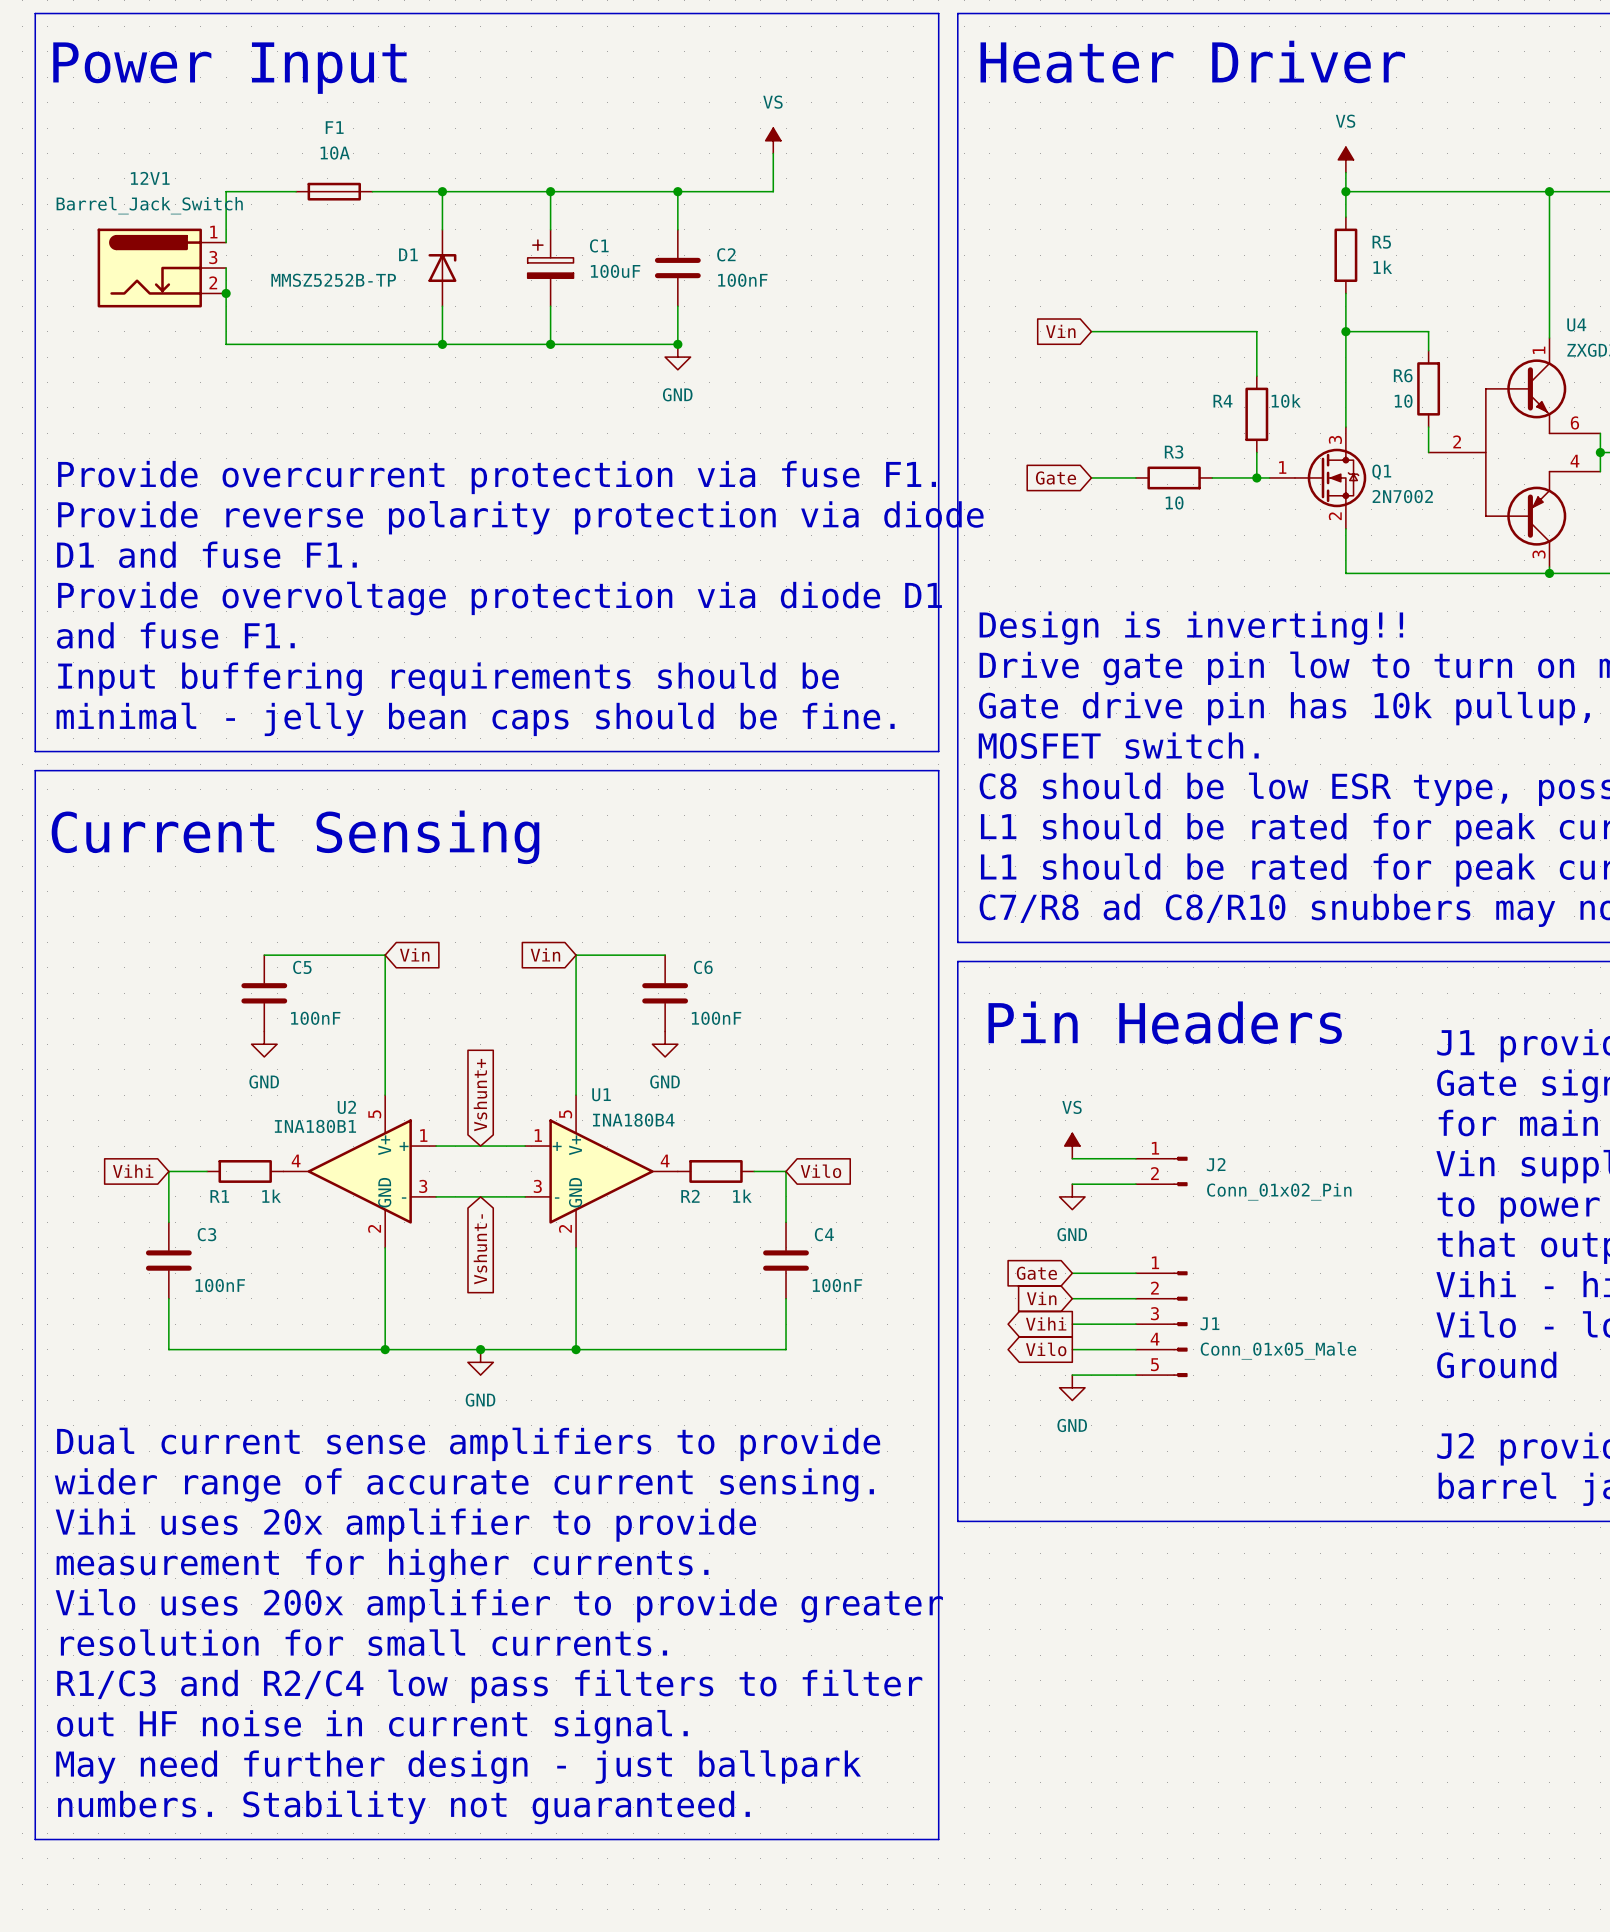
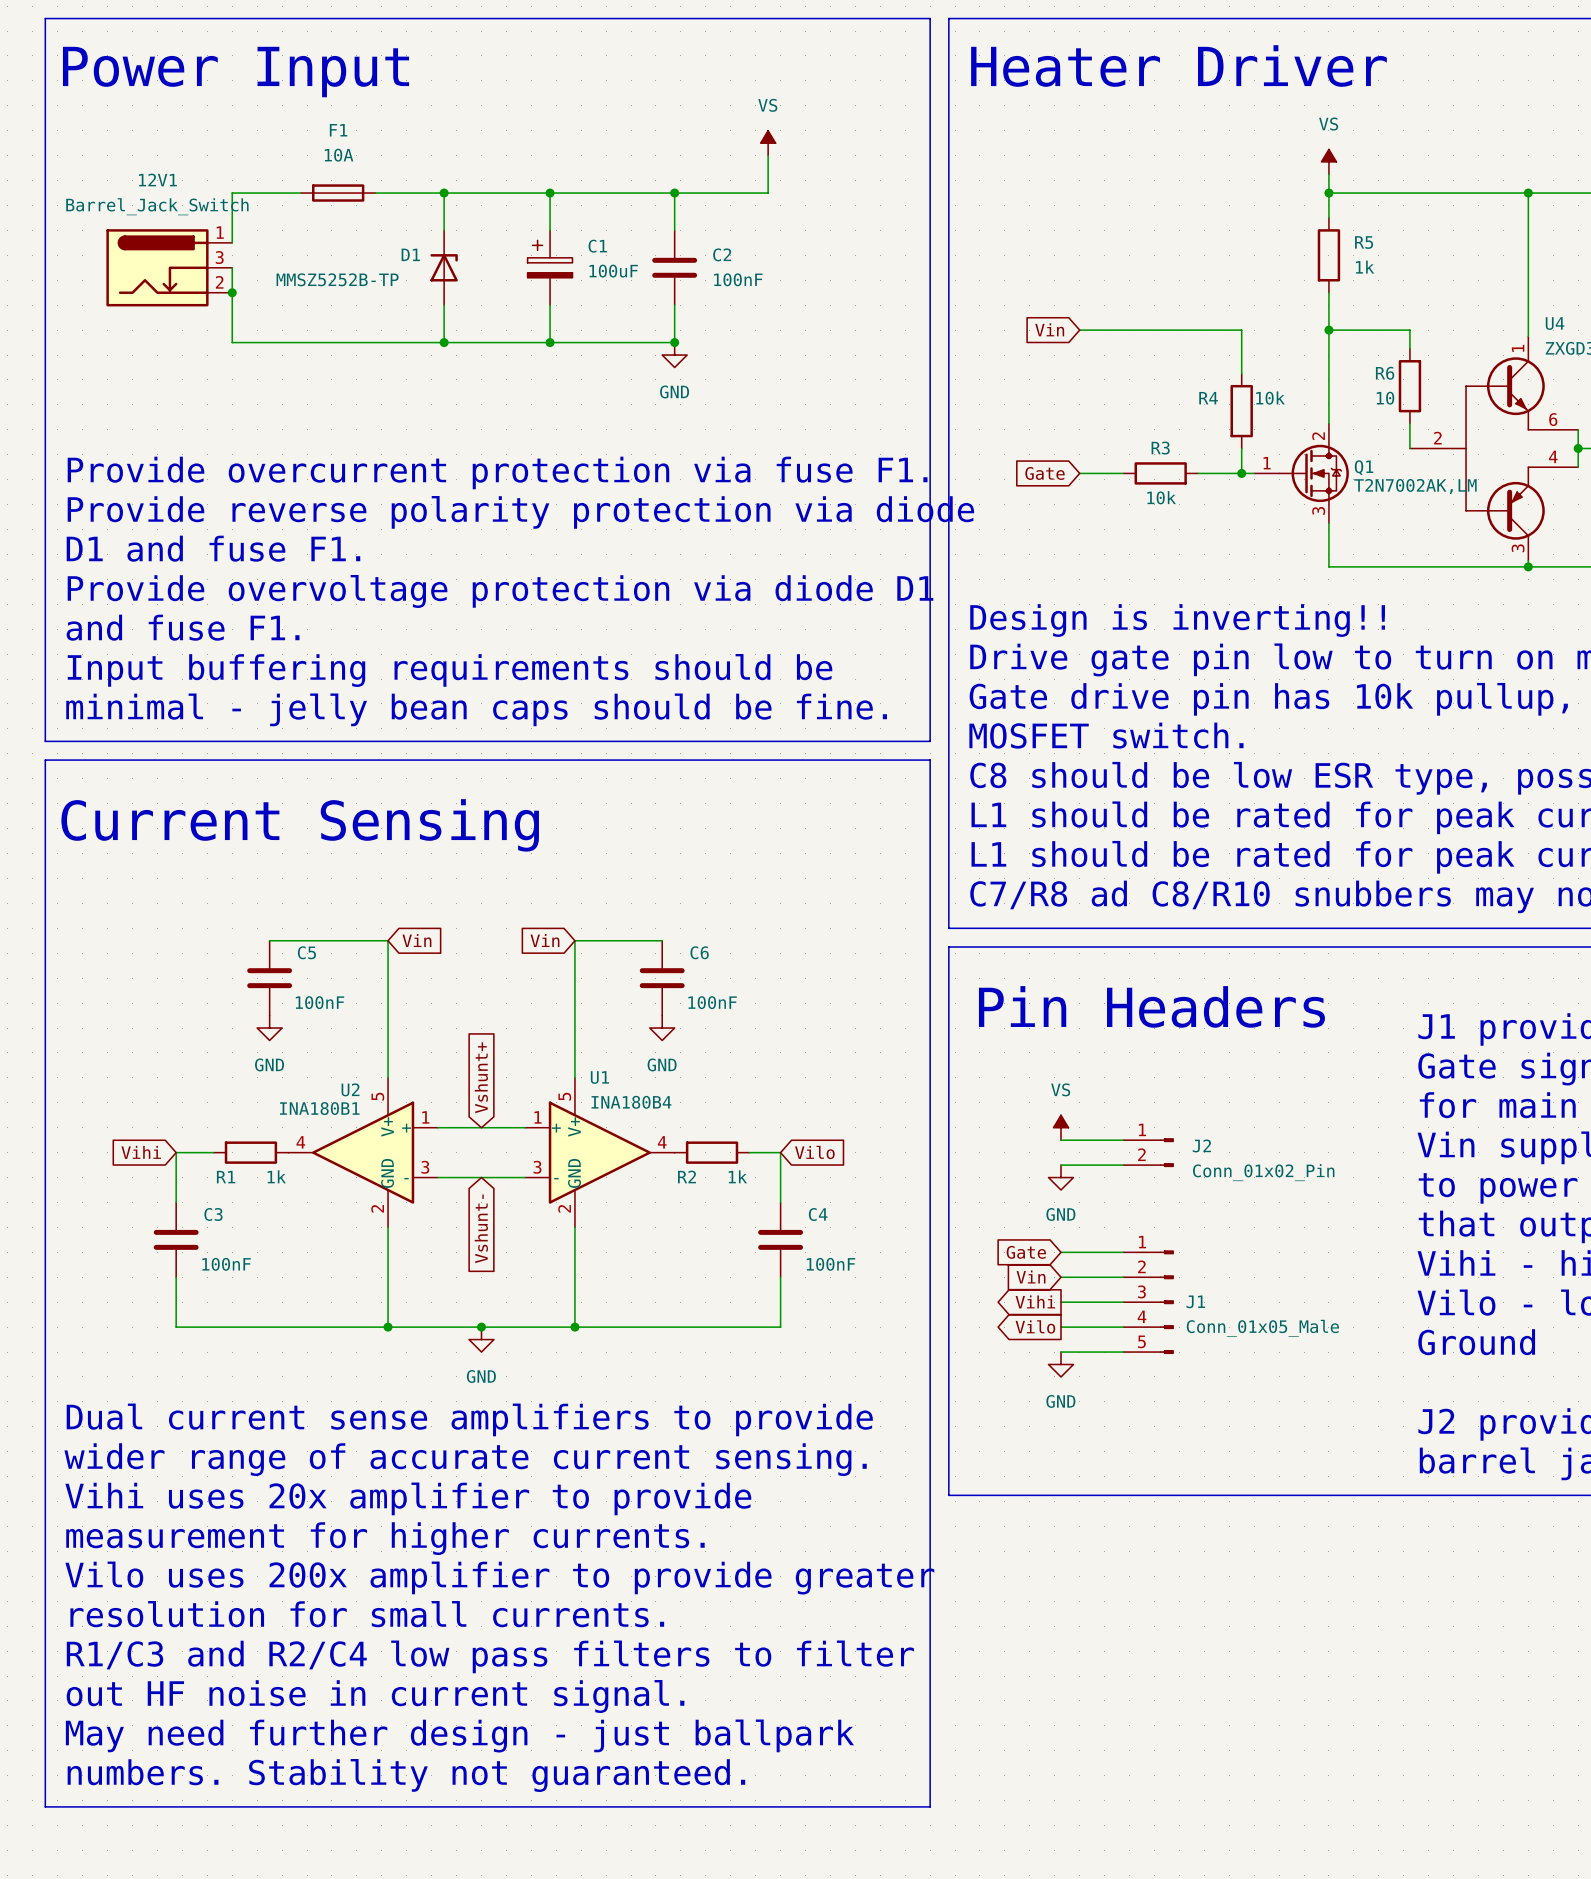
Q1 pin number: 3 (1335, 439) -> 2 (1318, 436)
Q1 value: 2N7002 (1402, 496) -> T2N7002AK,LM (1415, 486)
R3 value: 10 (1174, 502) -> 10k (1161, 497)
Q1 pin number: 2 (1335, 516) -> 3 (1318, 510)

